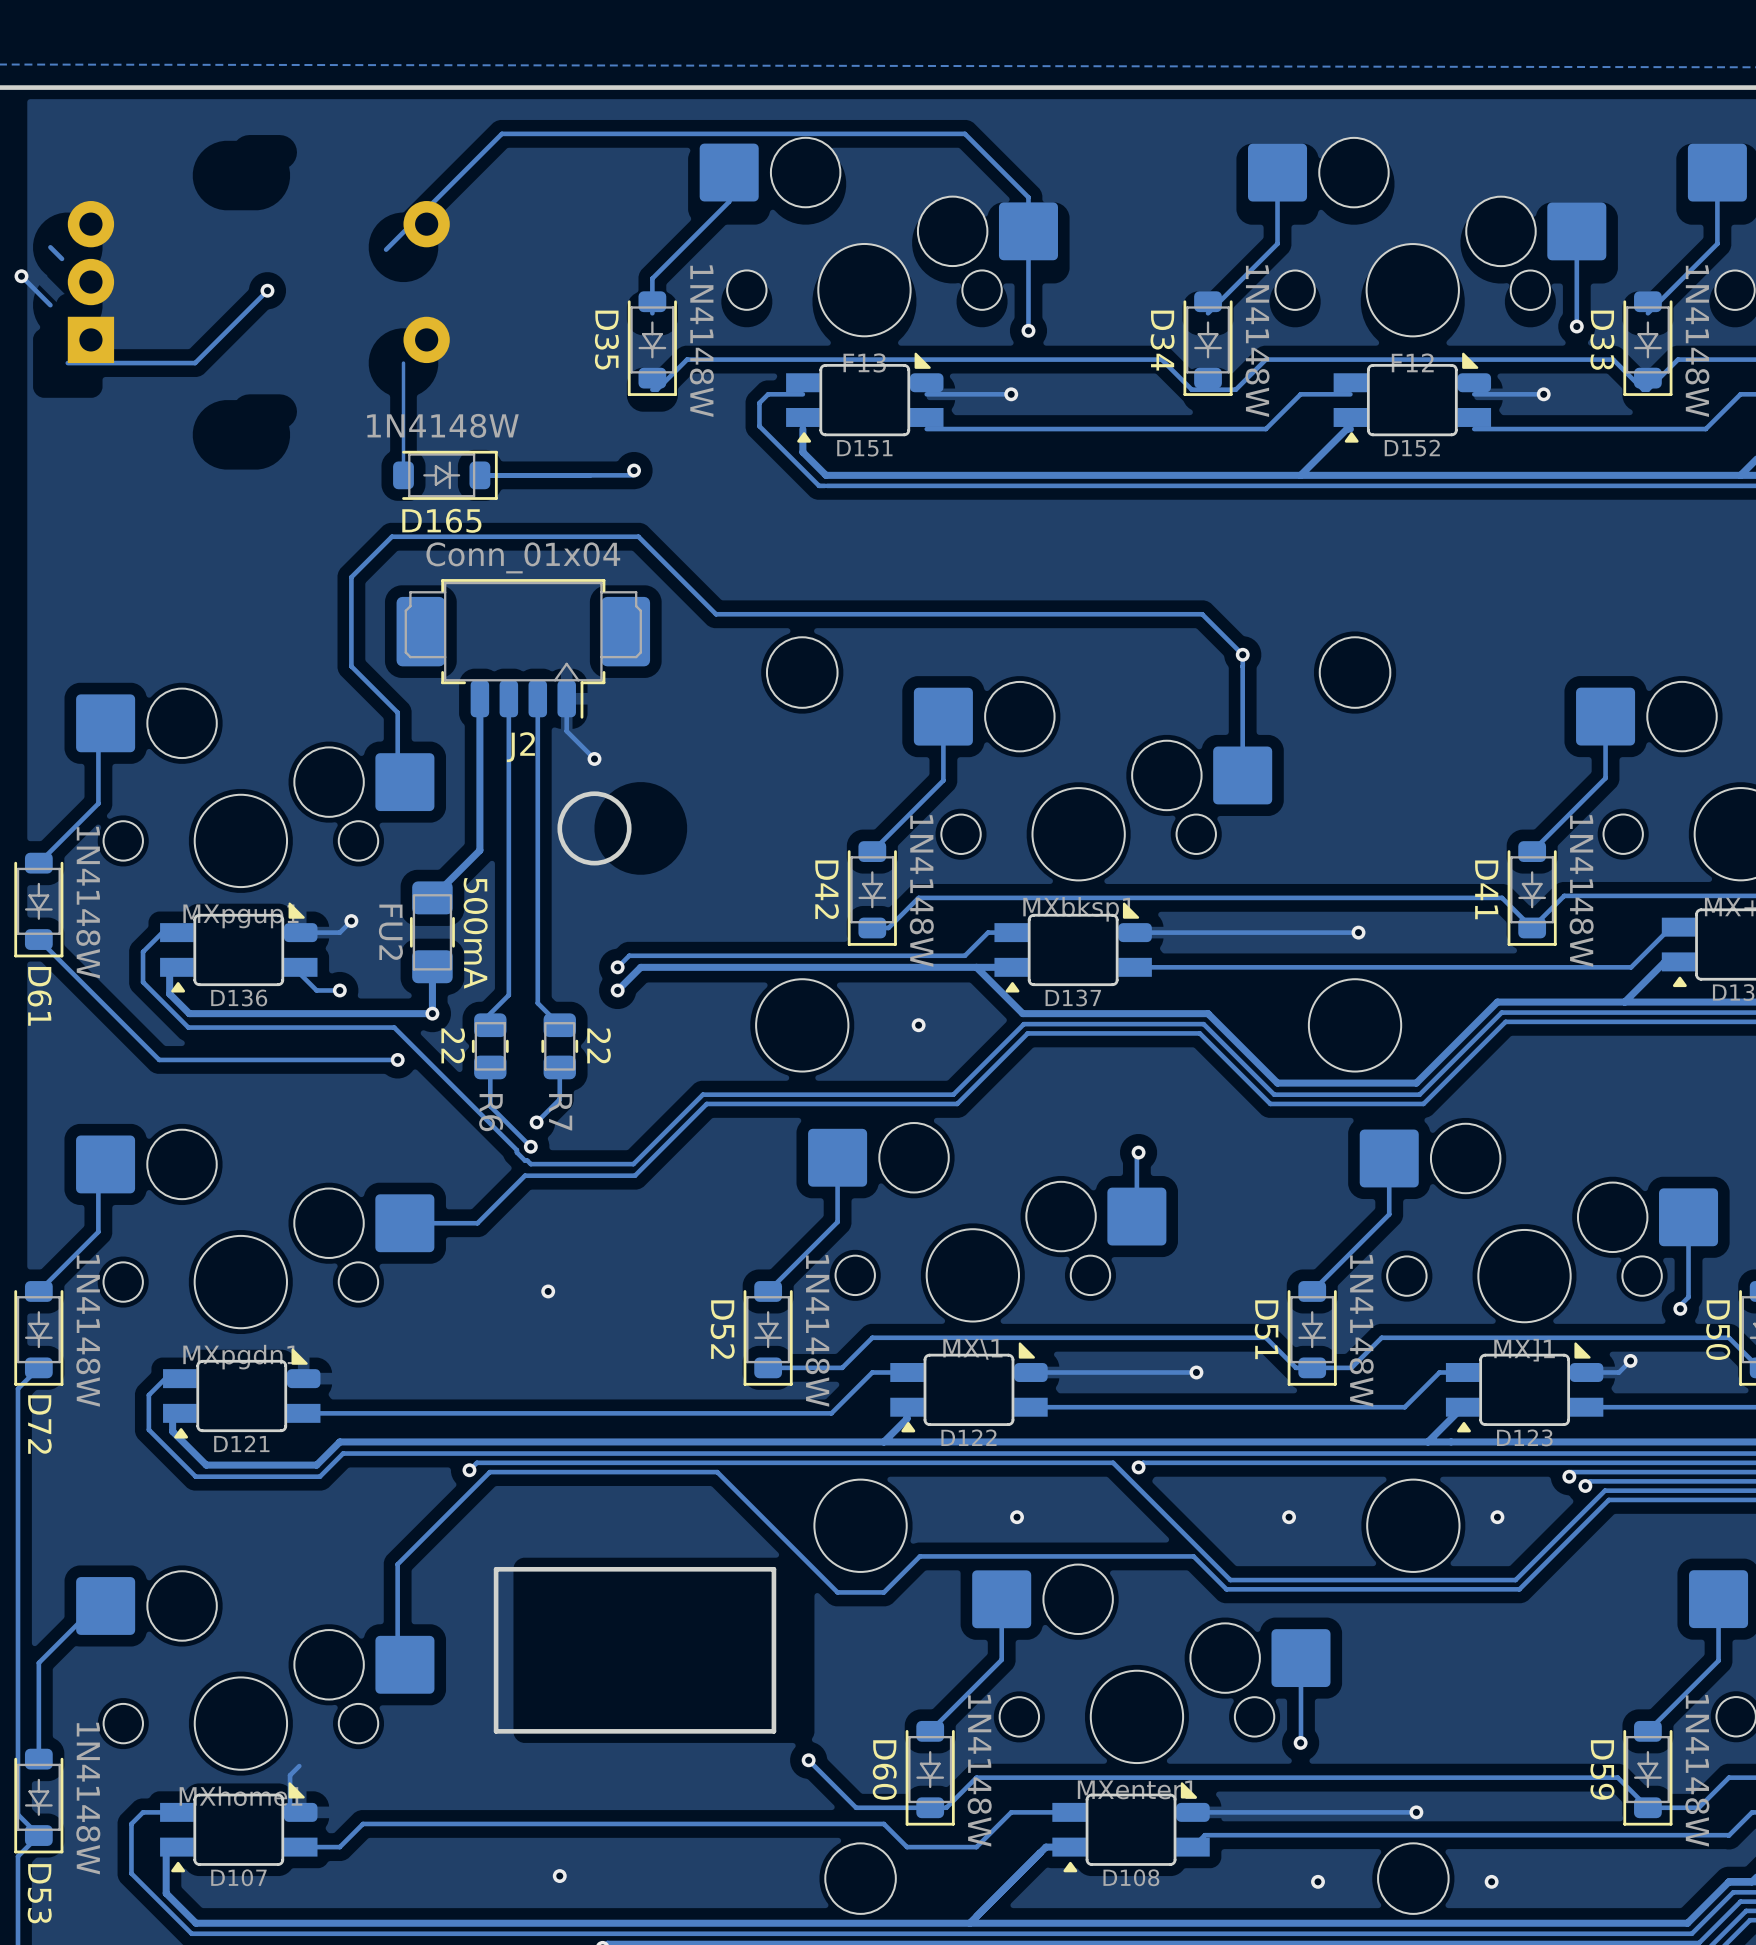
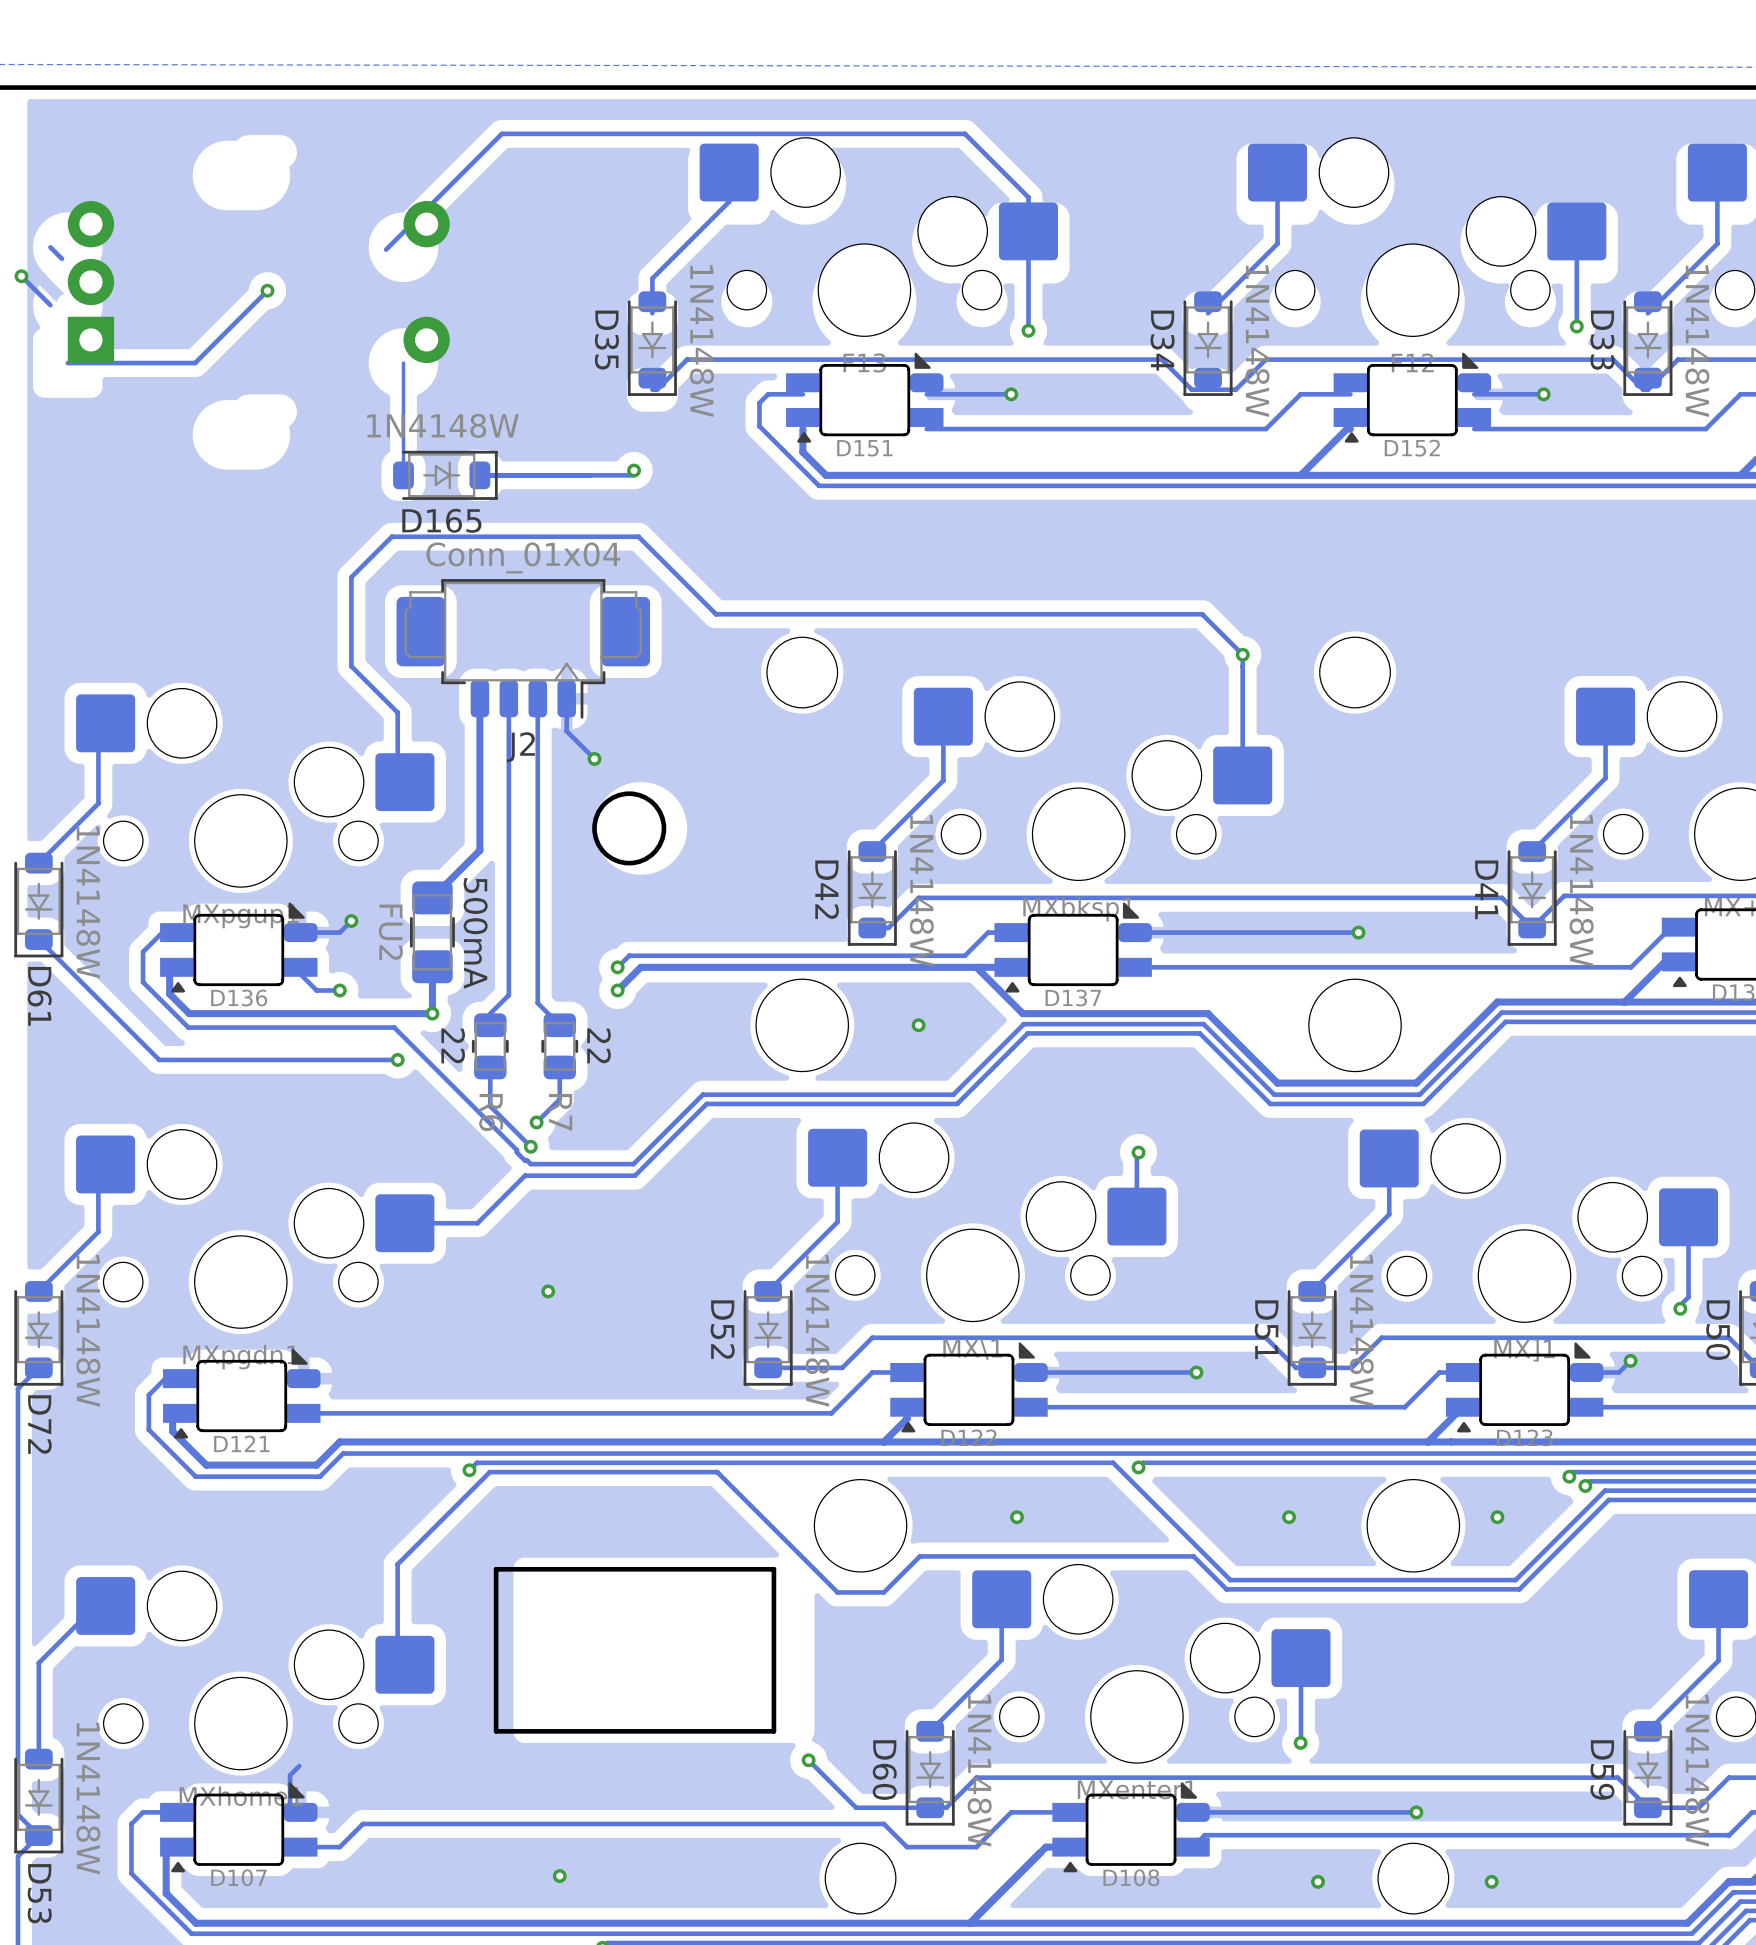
round board edge position: (594, 828) -> (629, 828)

